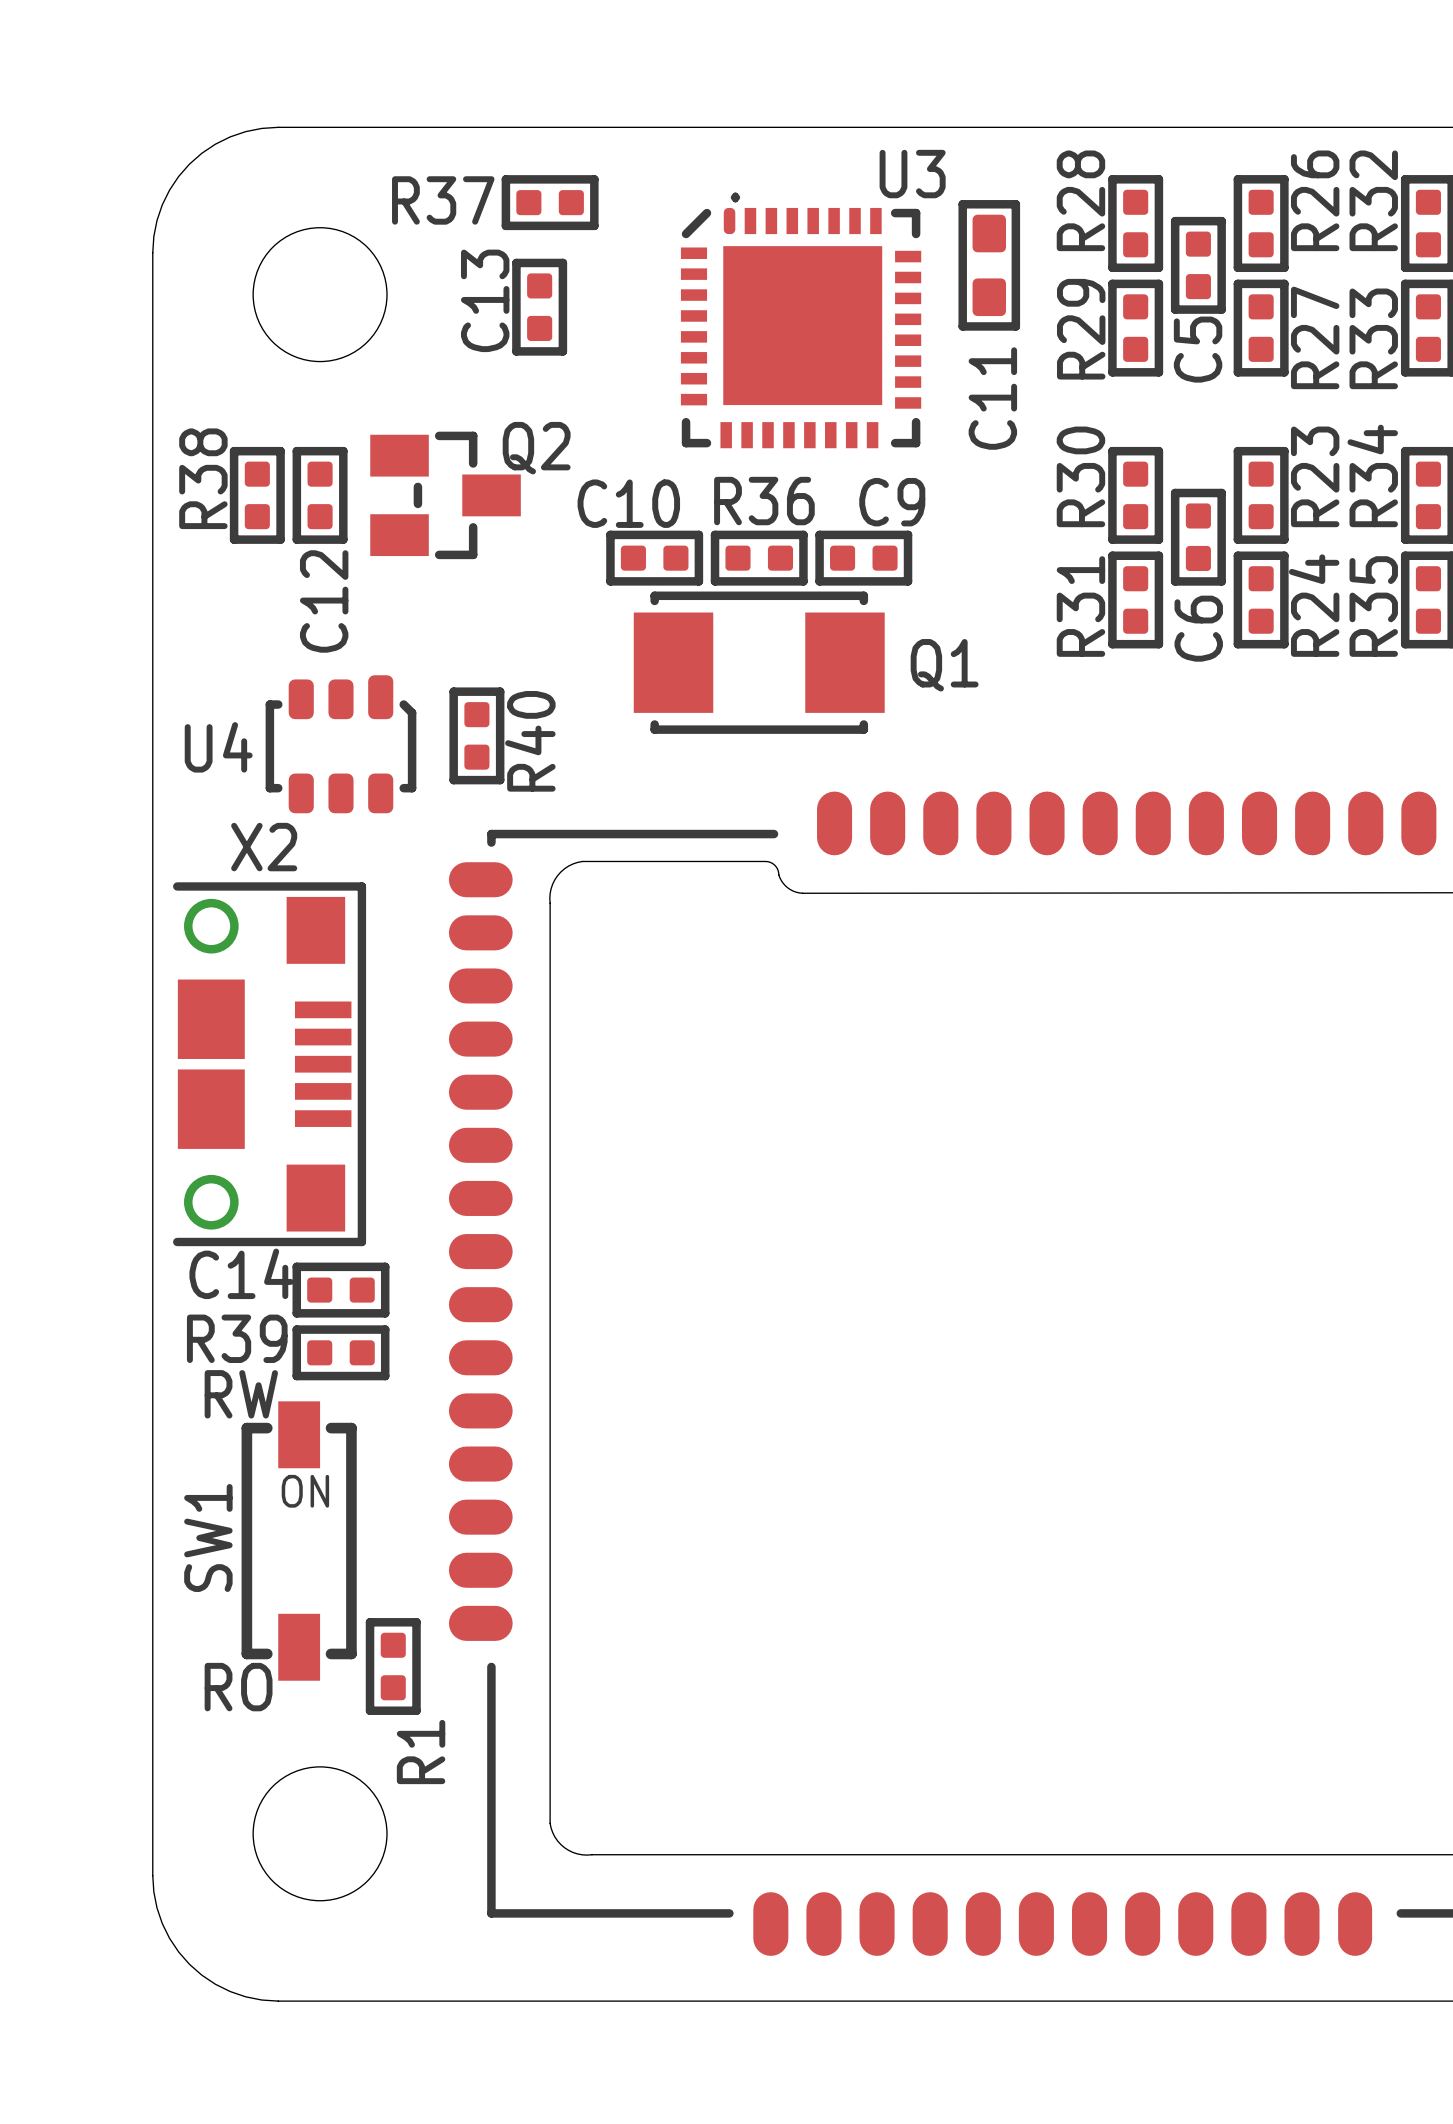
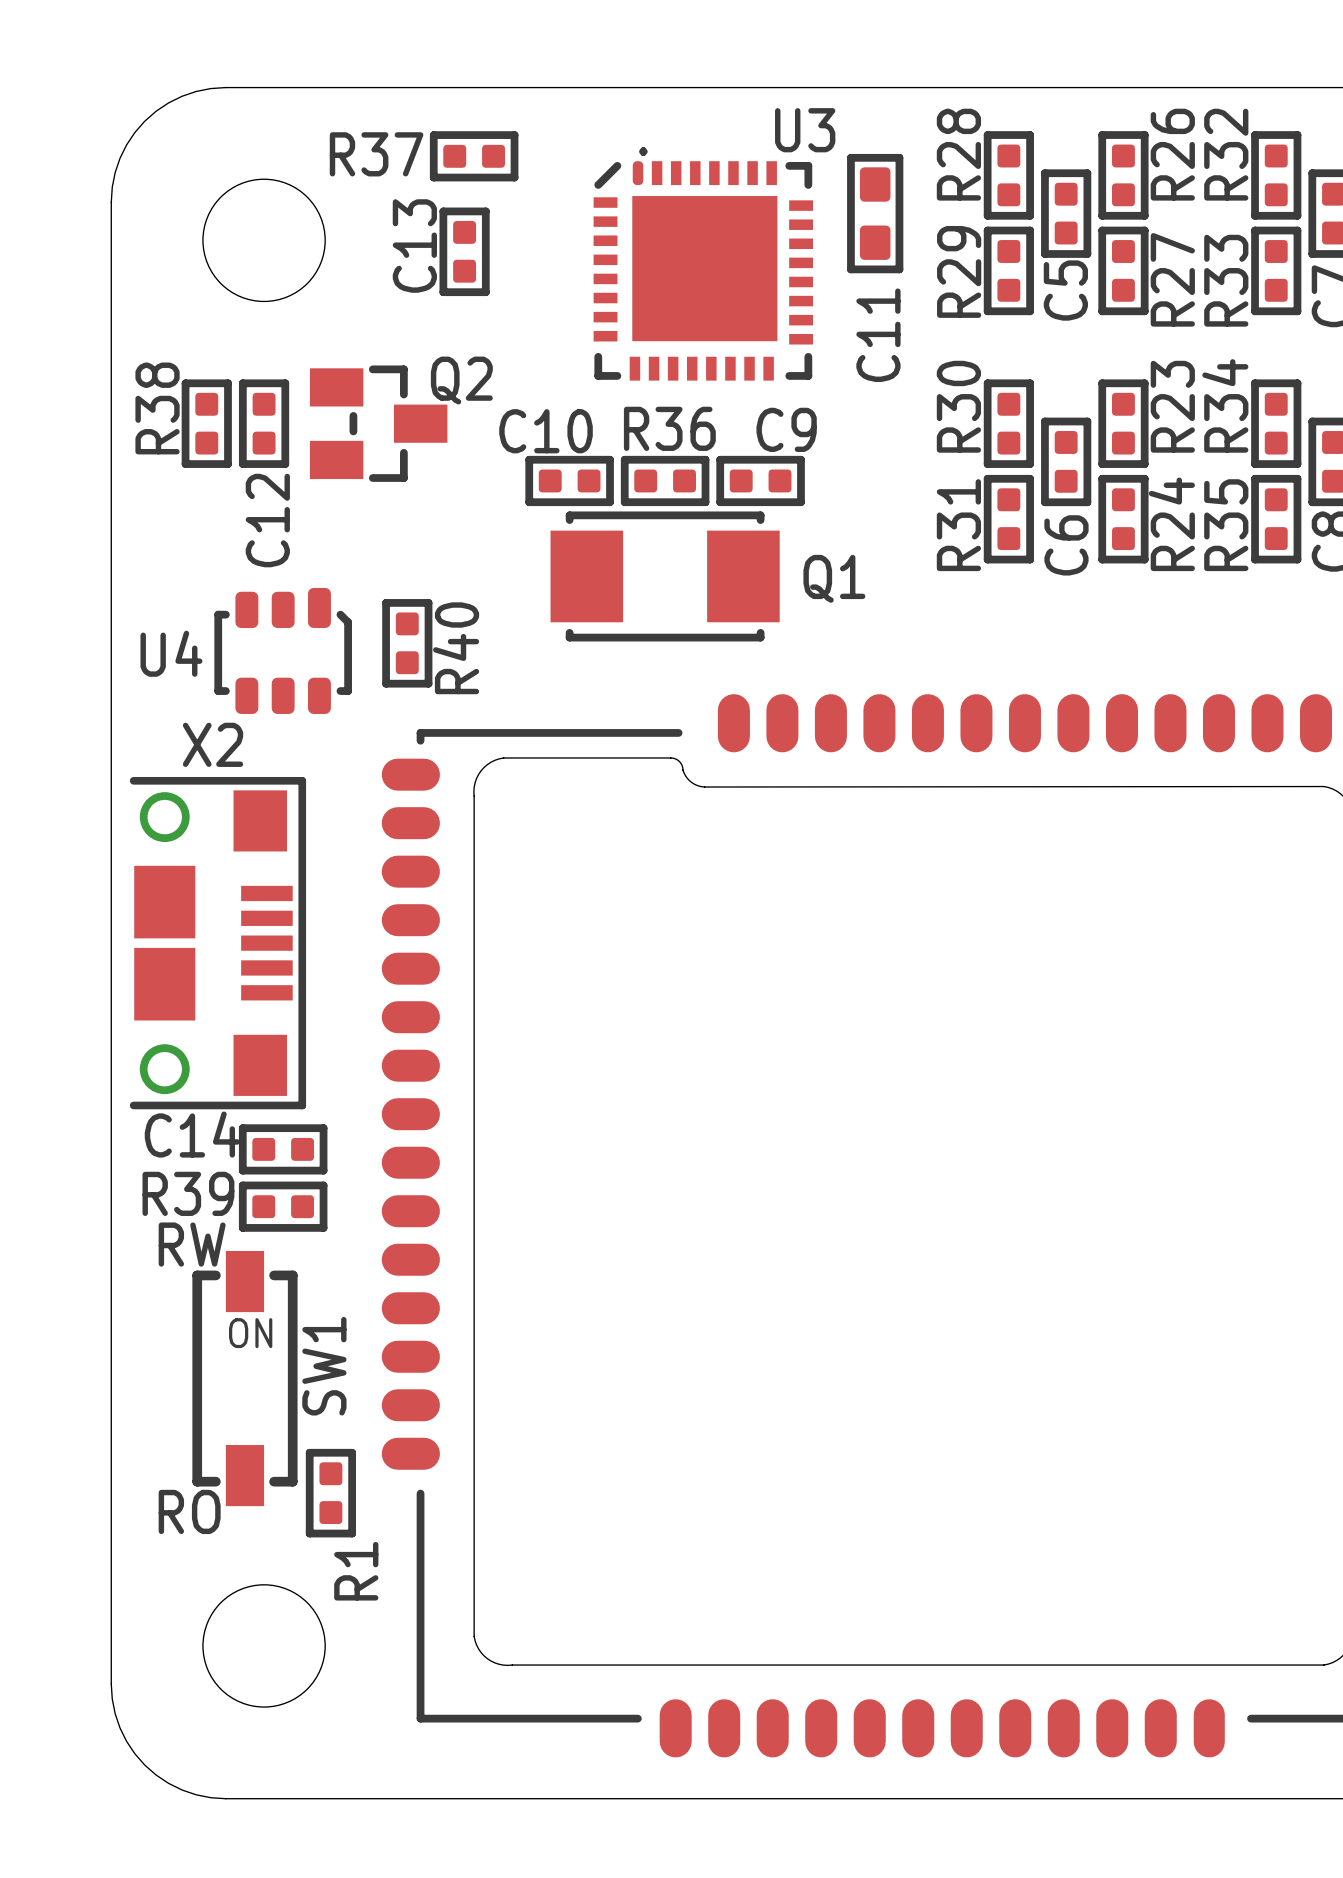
SW1 name position: SW1 (208, 1537) -> SW1 (324, 1366)

